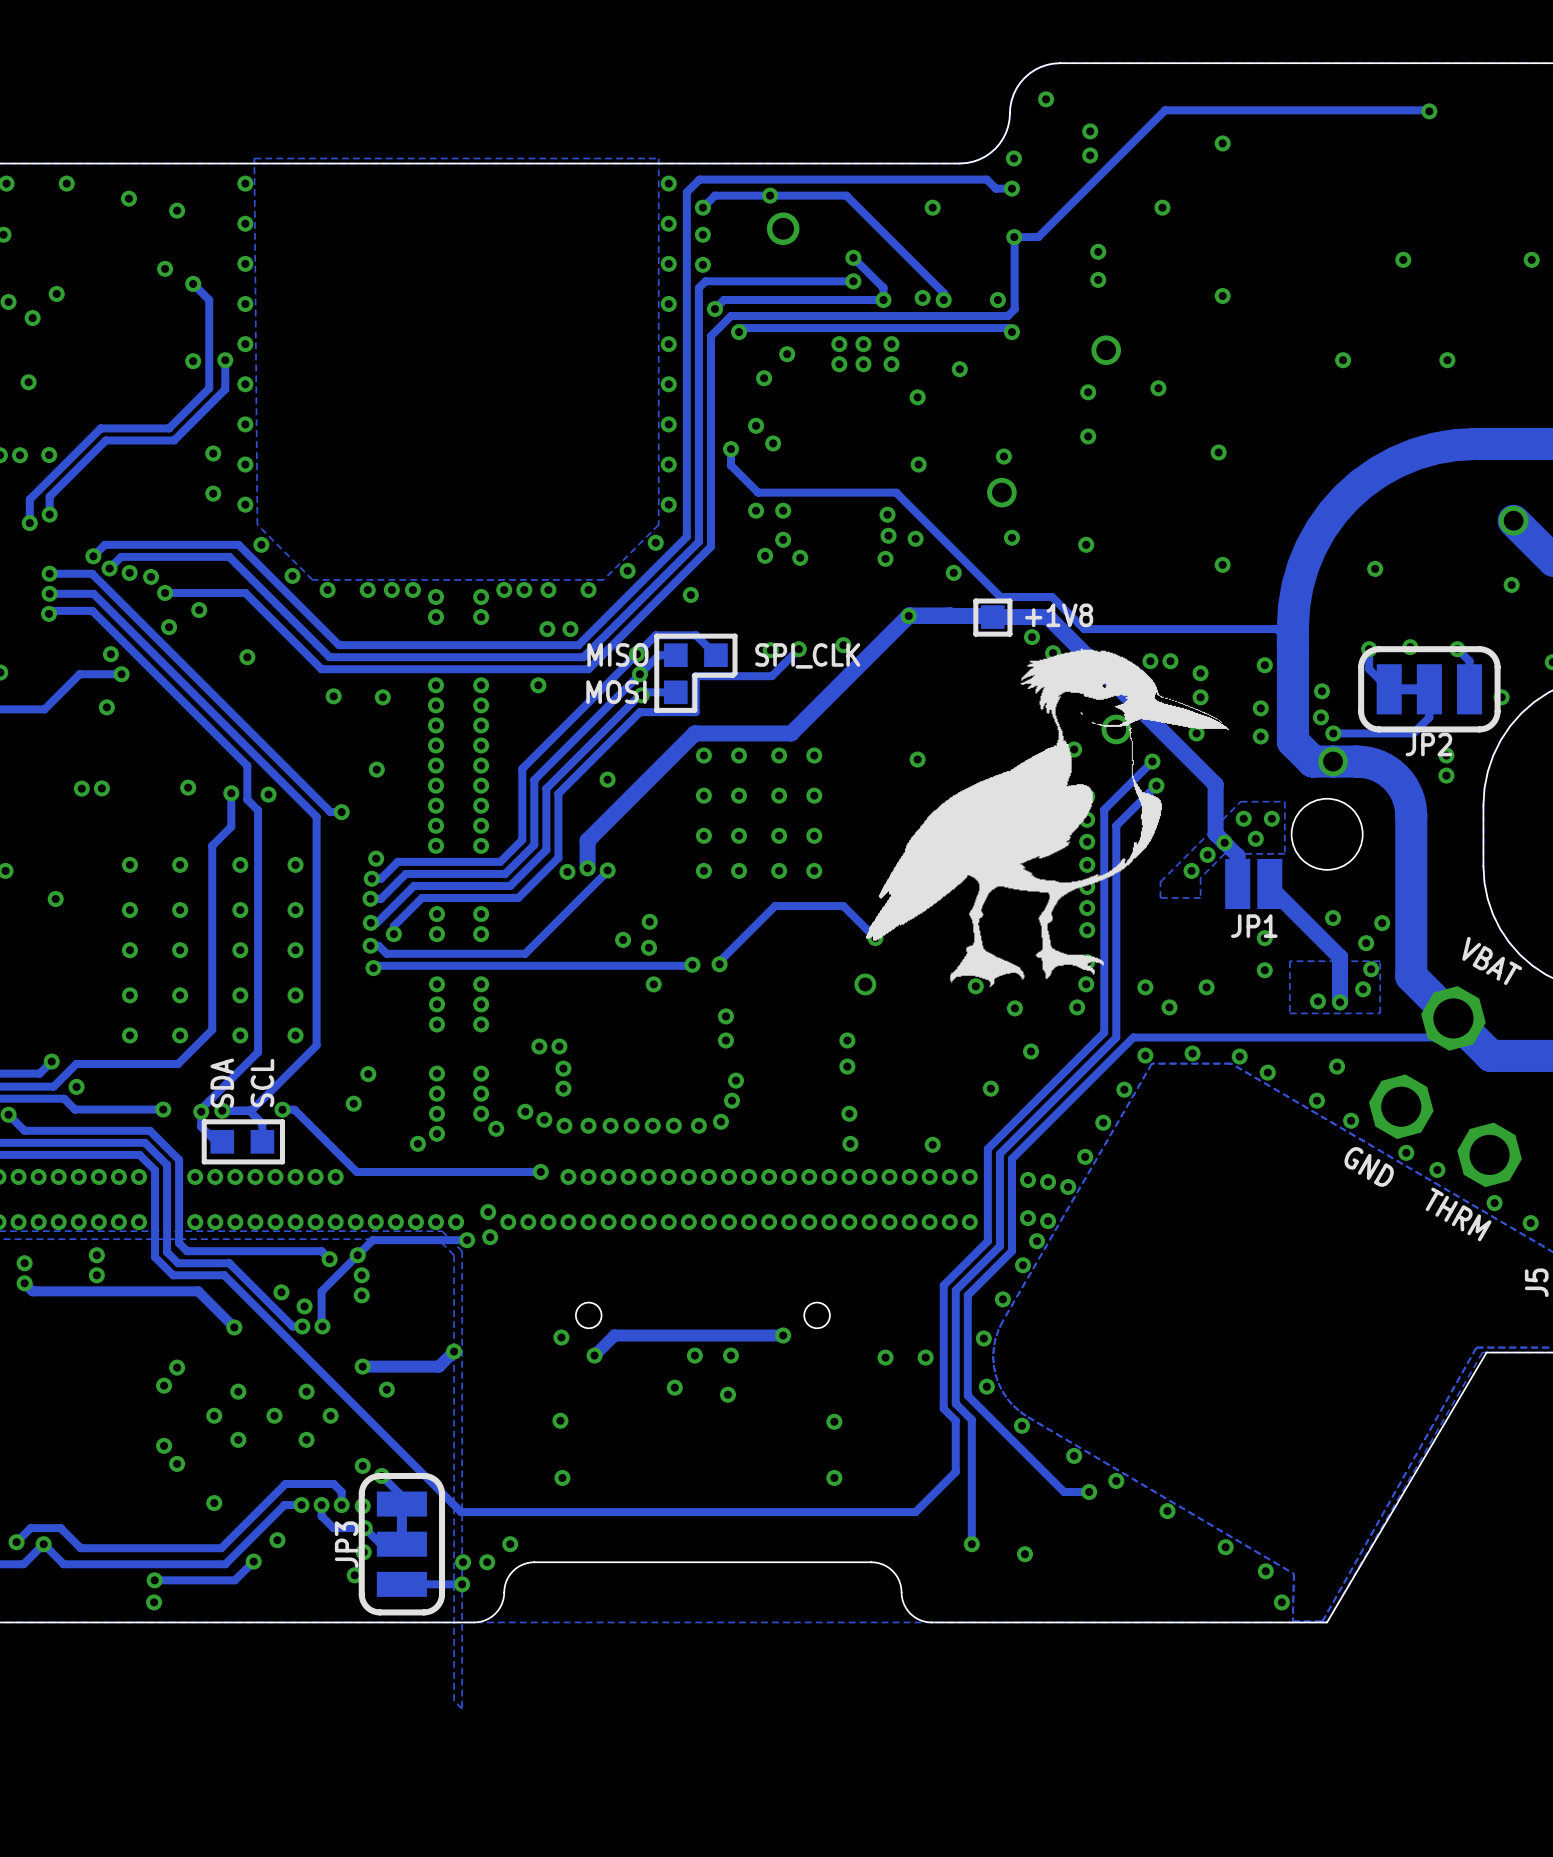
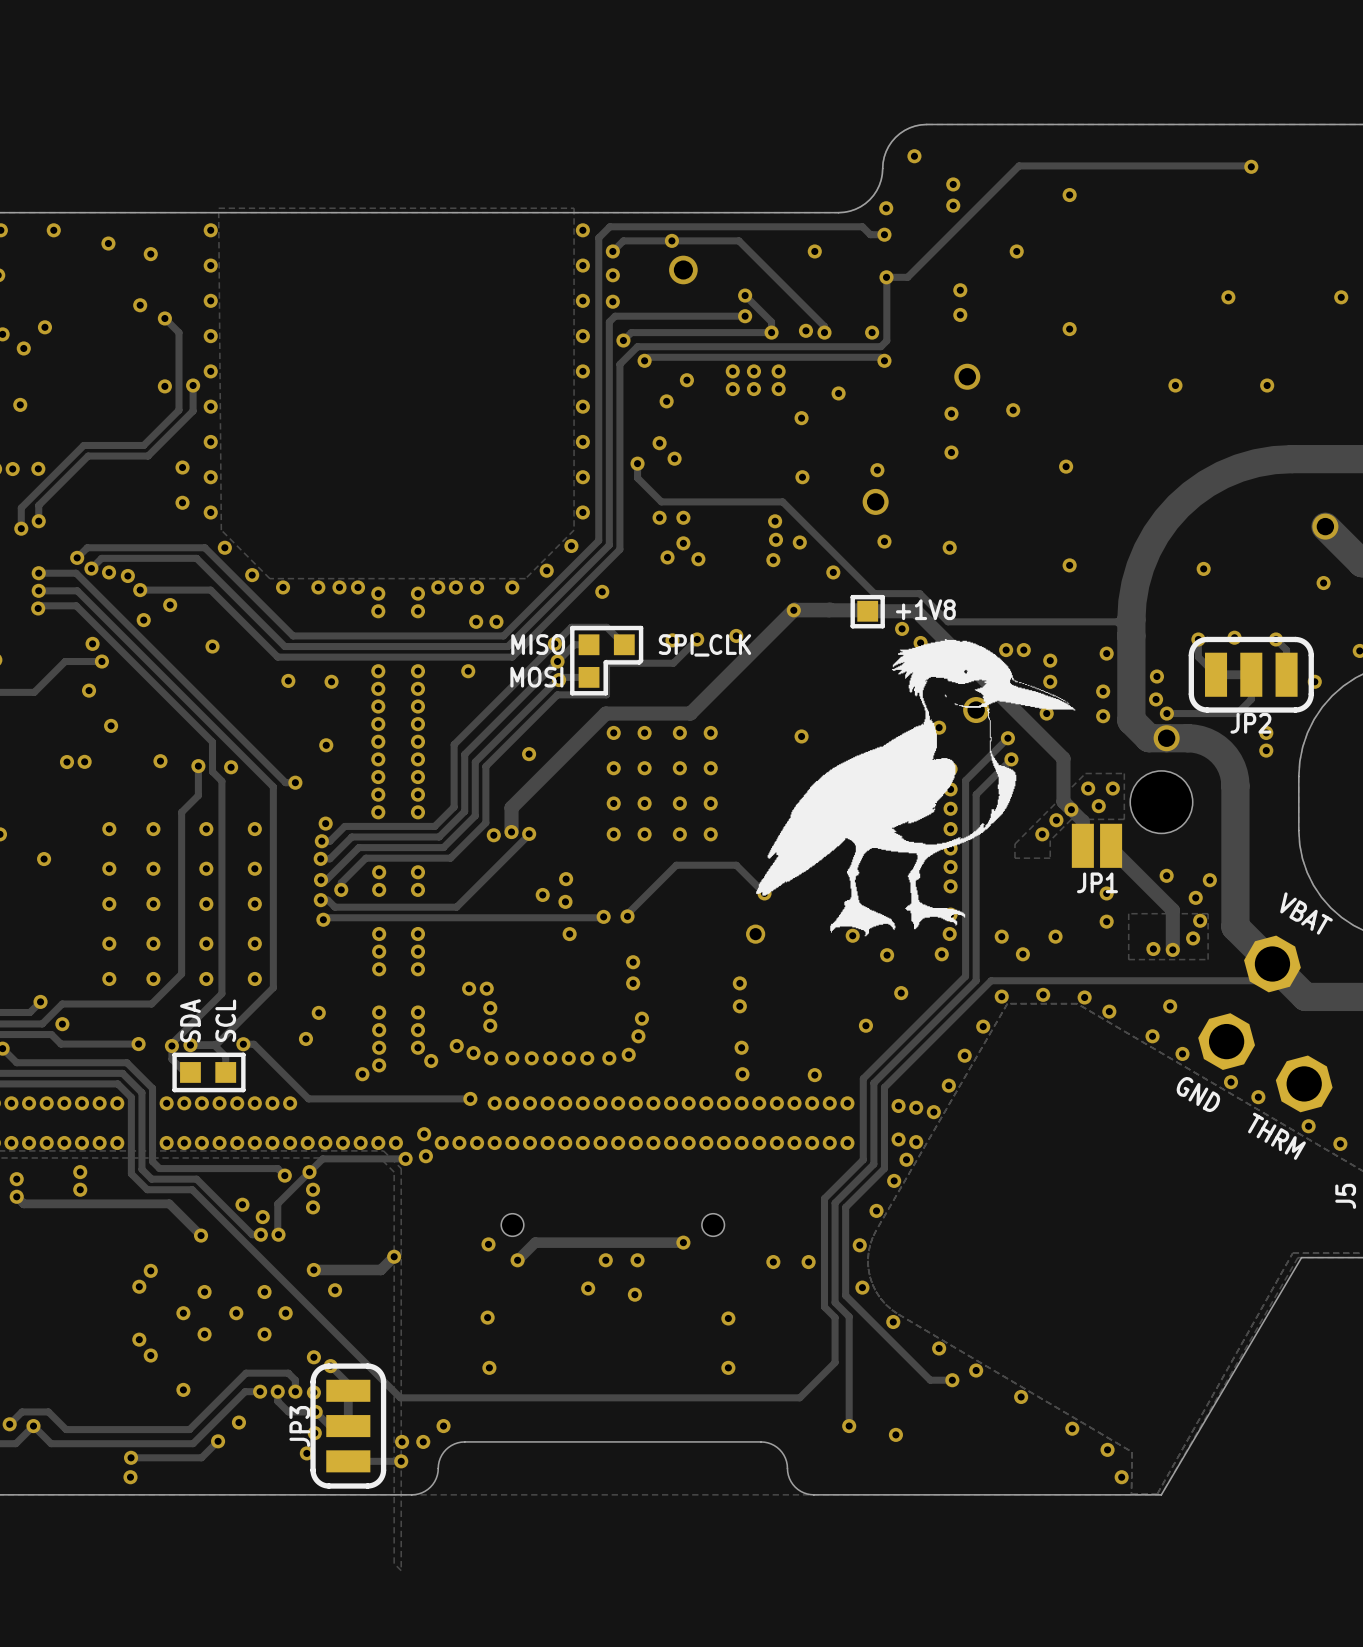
via: none -> (111, 725)

